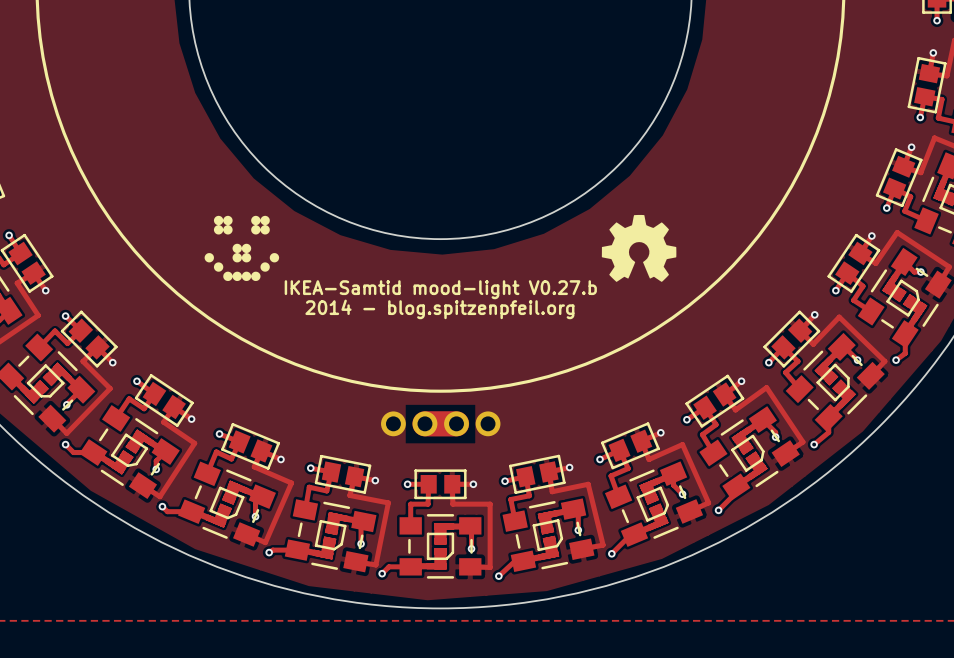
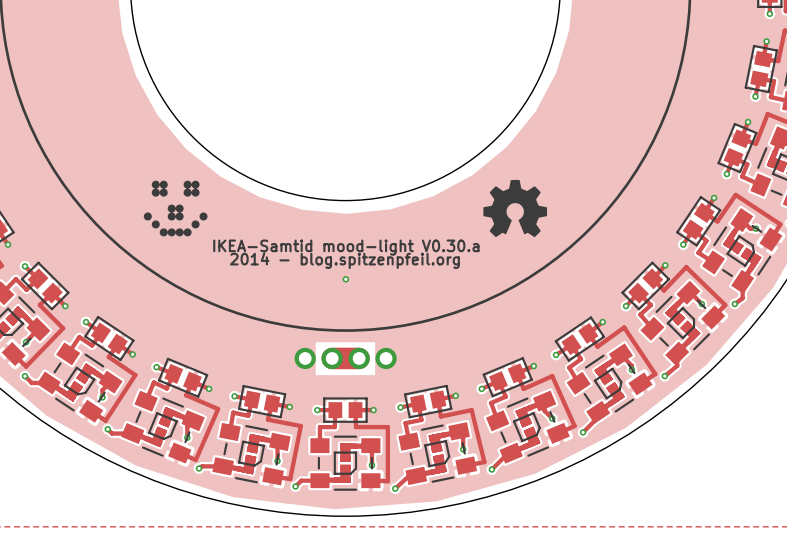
text: IKEA-Samtid mood-light V0.27.b (440, 289) -> IKEA-Samtid mood-light V0.30.a (346, 247)
via: none -> (345, 279)

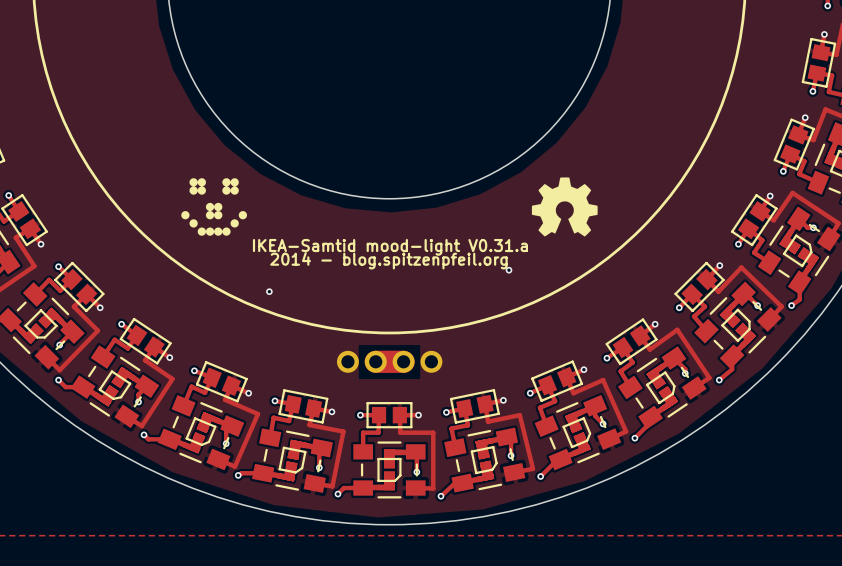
text: IKEA-Samtid mood-light V0.30.a (346, 247) -> IKEA-Samtid mood-light V0.31.a (390, 247)
via: none -> (508, 270)
via: (345, 279) -> none
via: none -> (269, 291)

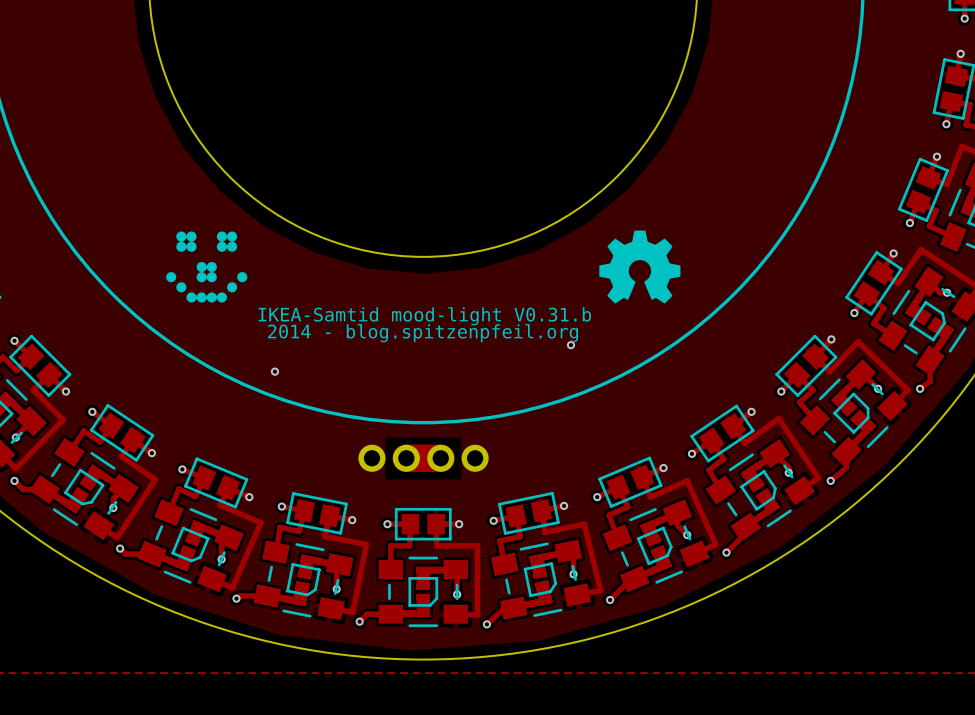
text: IKEA-Samtid mood-light V0.31.a (390, 247) -> IKEA-Samtid mood-light V0.31.b (424, 316)

